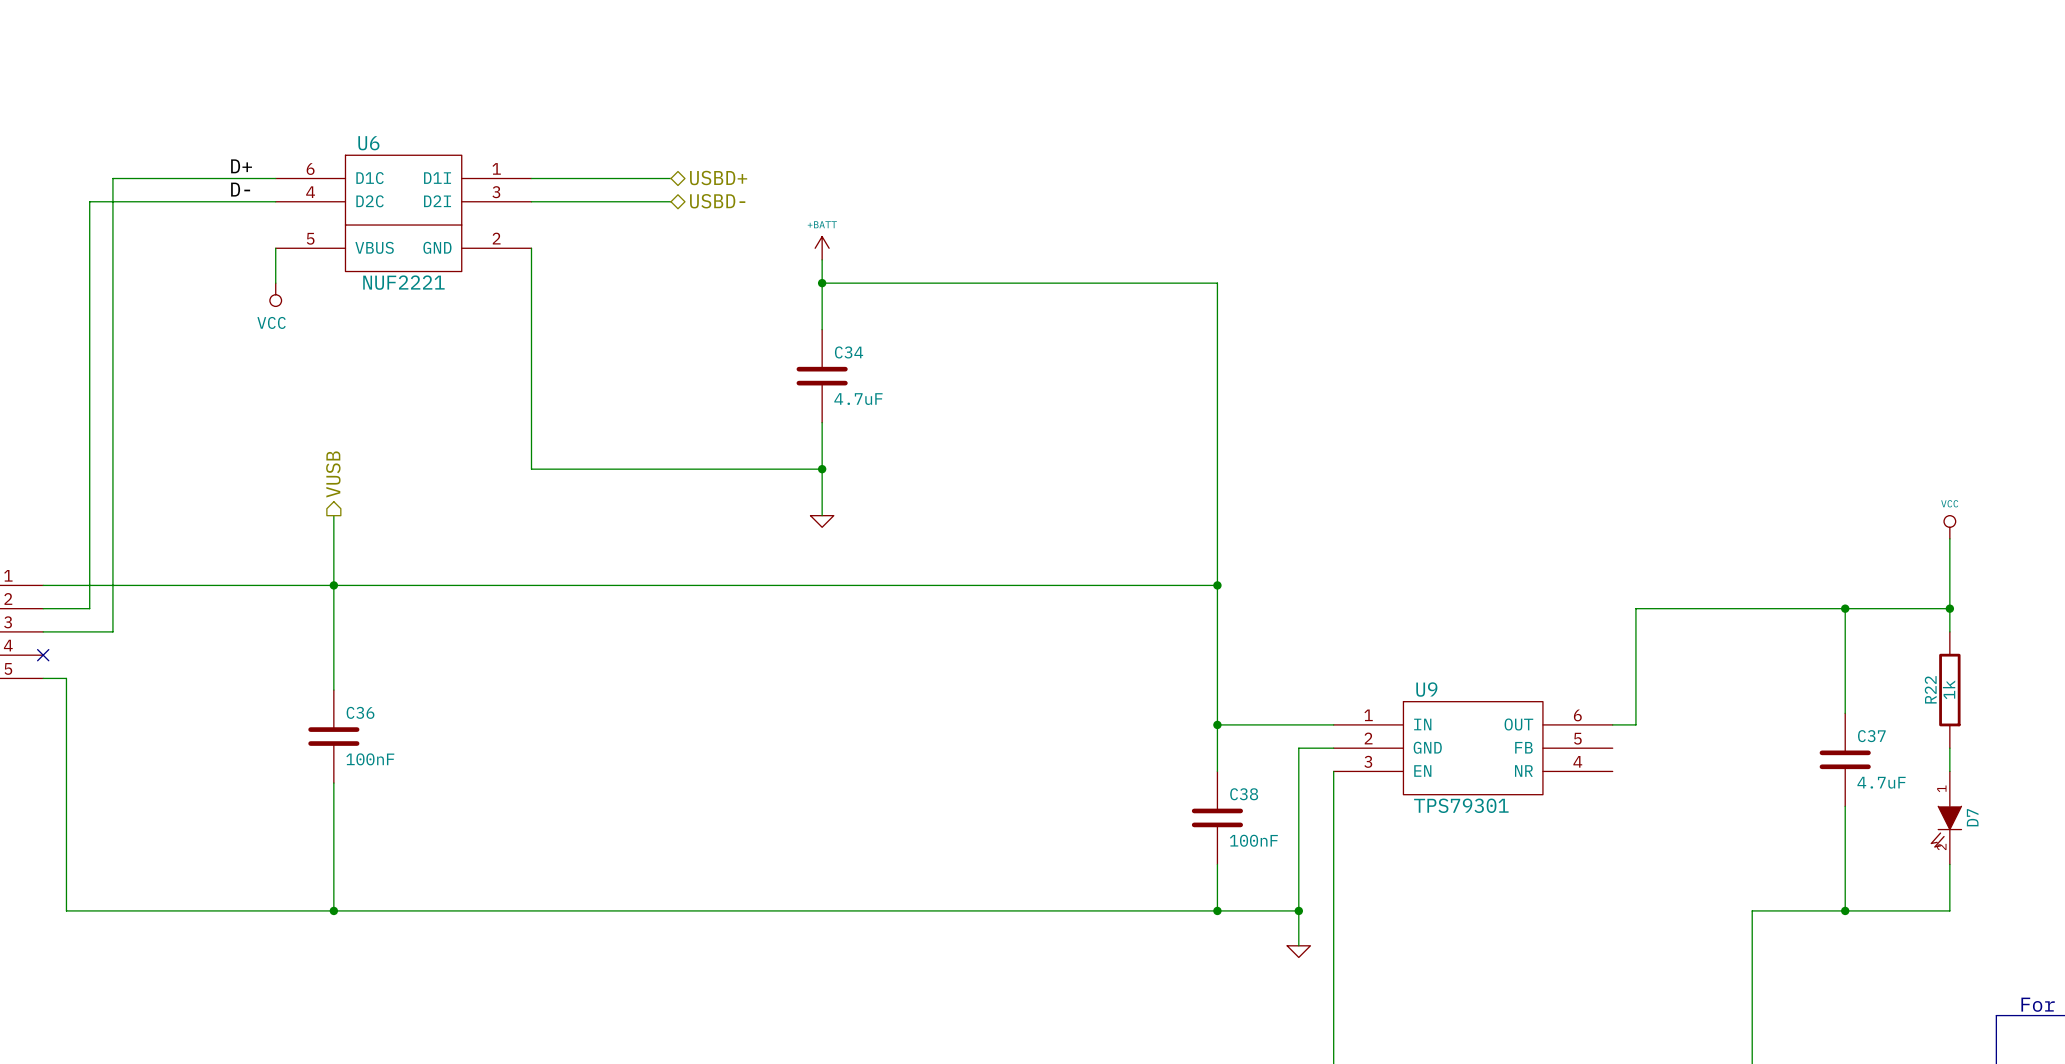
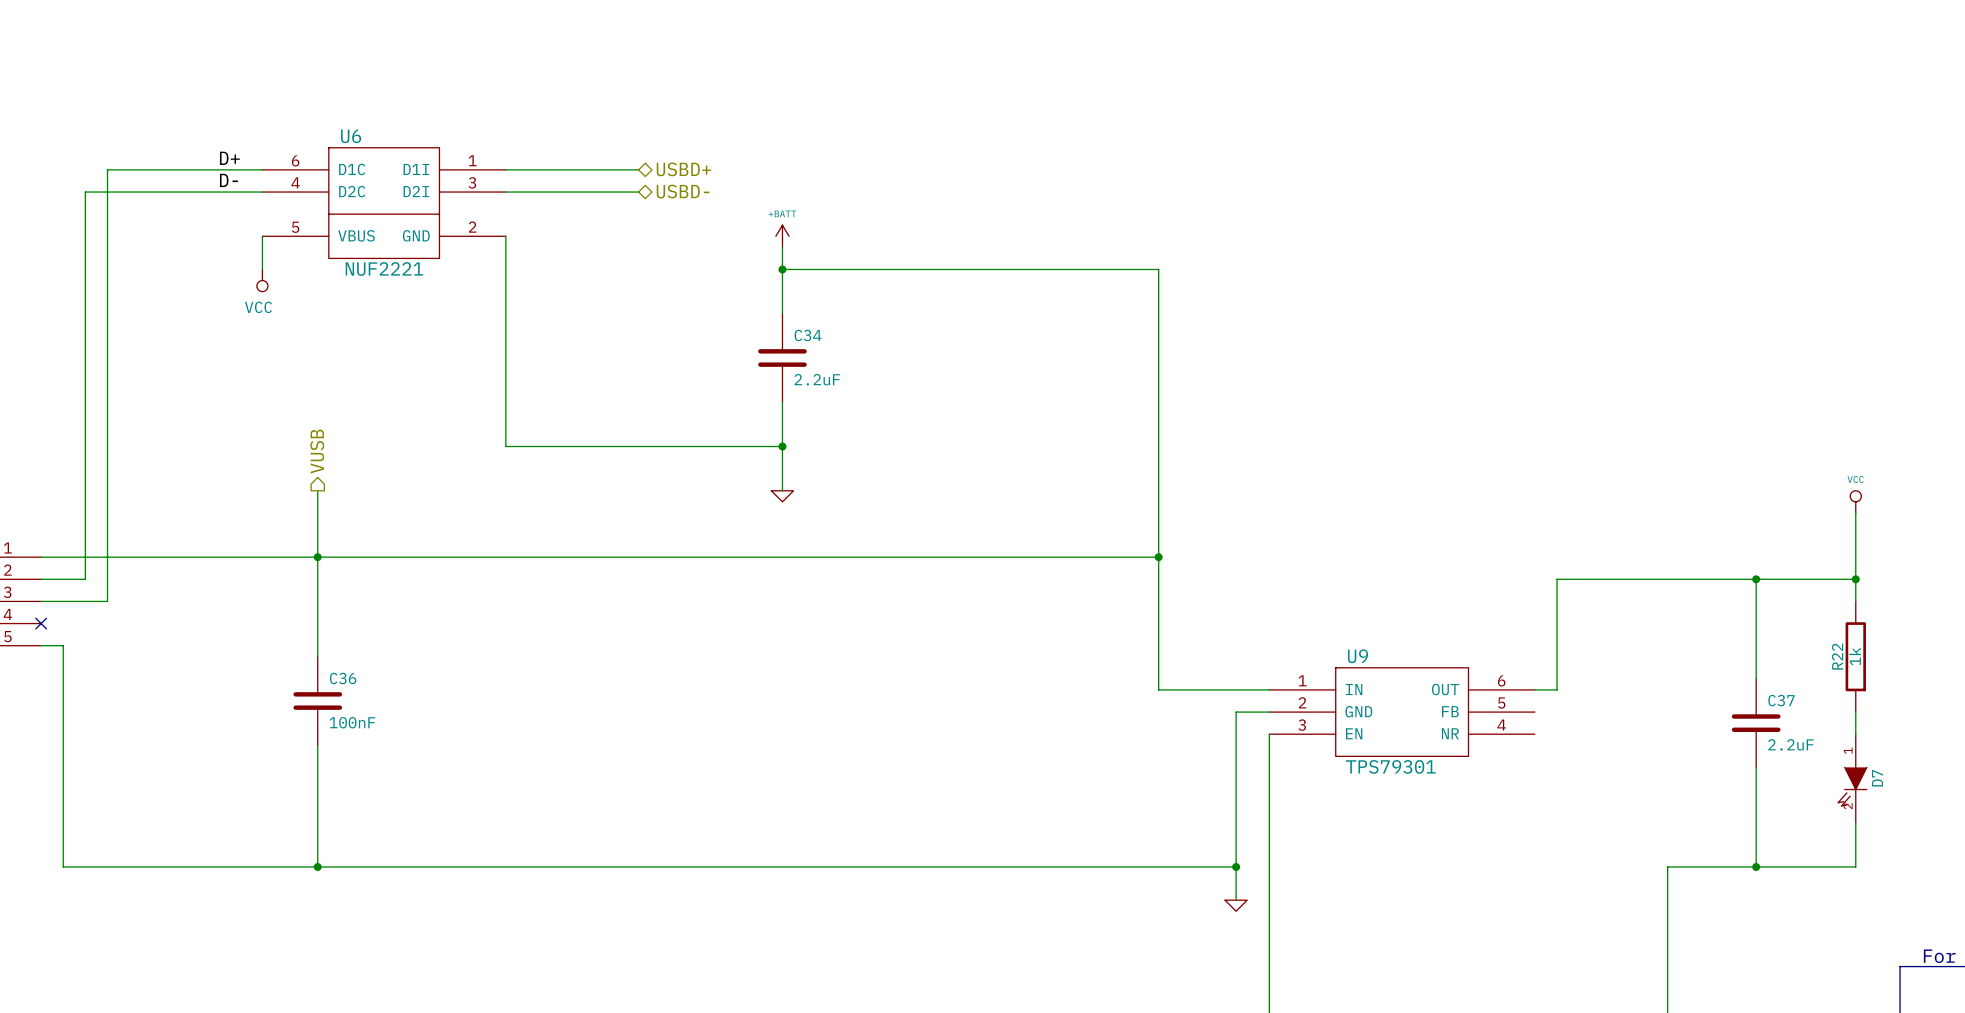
C34 value: 4.7uF (858, 399) -> 2.2uF (817, 379)
wire: (1217, 724) (1217, 771) -> none
junction: (1217, 724) -> none
C37 value: 4.7uF (1881, 782) -> 2.2uF (1790, 744)
C38: 100nF (1217, 817) -> none
wire: (1217, 864) (1217, 910) -> none
junction: (1217, 910) -> none

